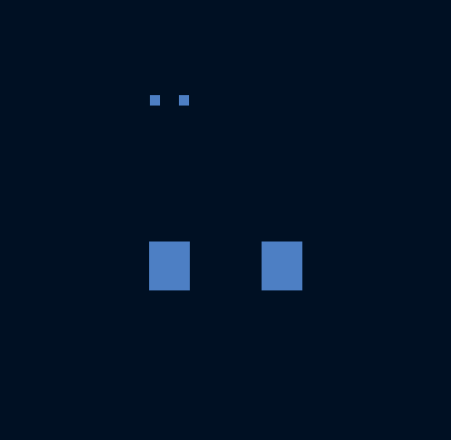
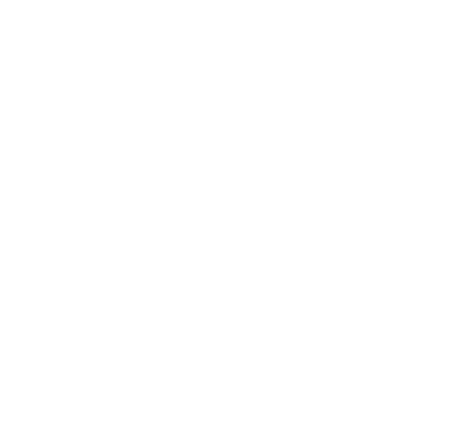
part: (169, 100) -> none
part: (225, 265) -> none

